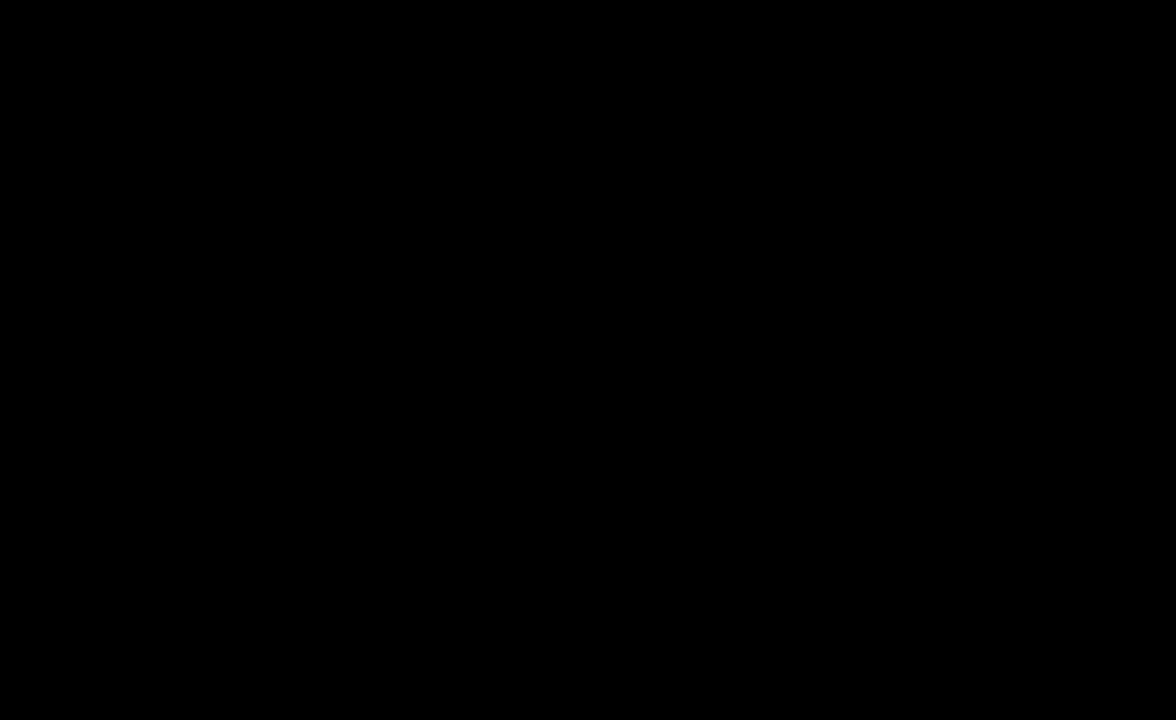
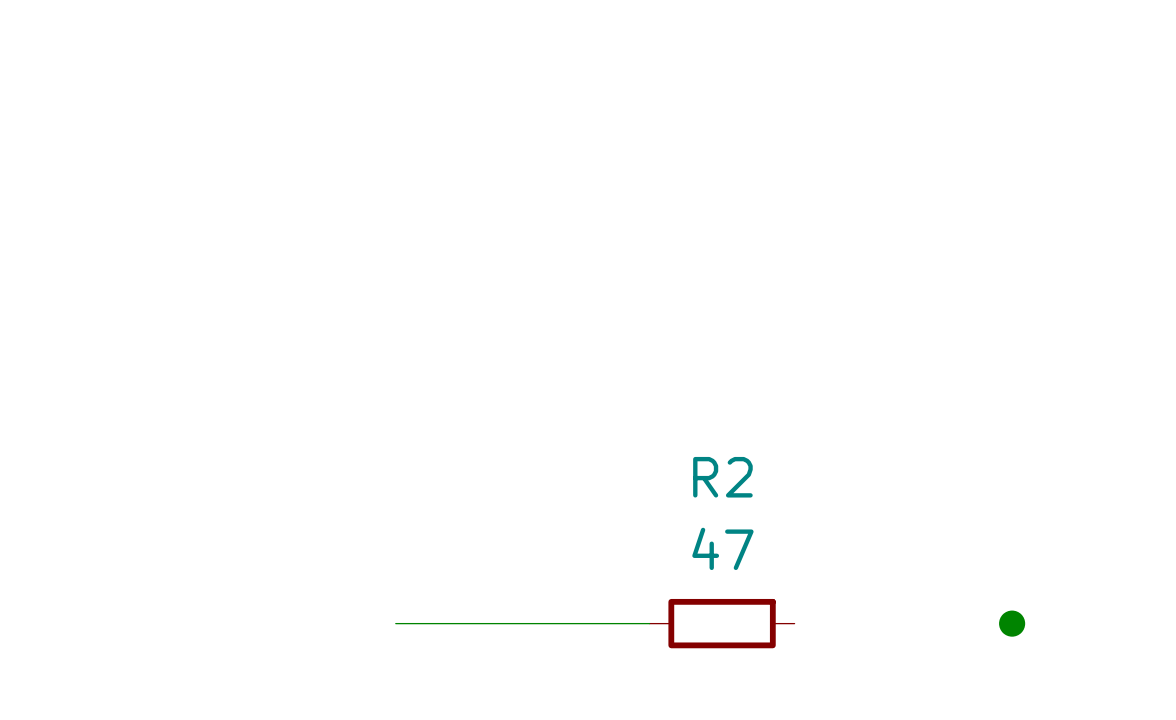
wire: none -> (395, 623) (649, 623)
R2: none -> 47 (722, 623)
junction: none -> (1012, 623)

